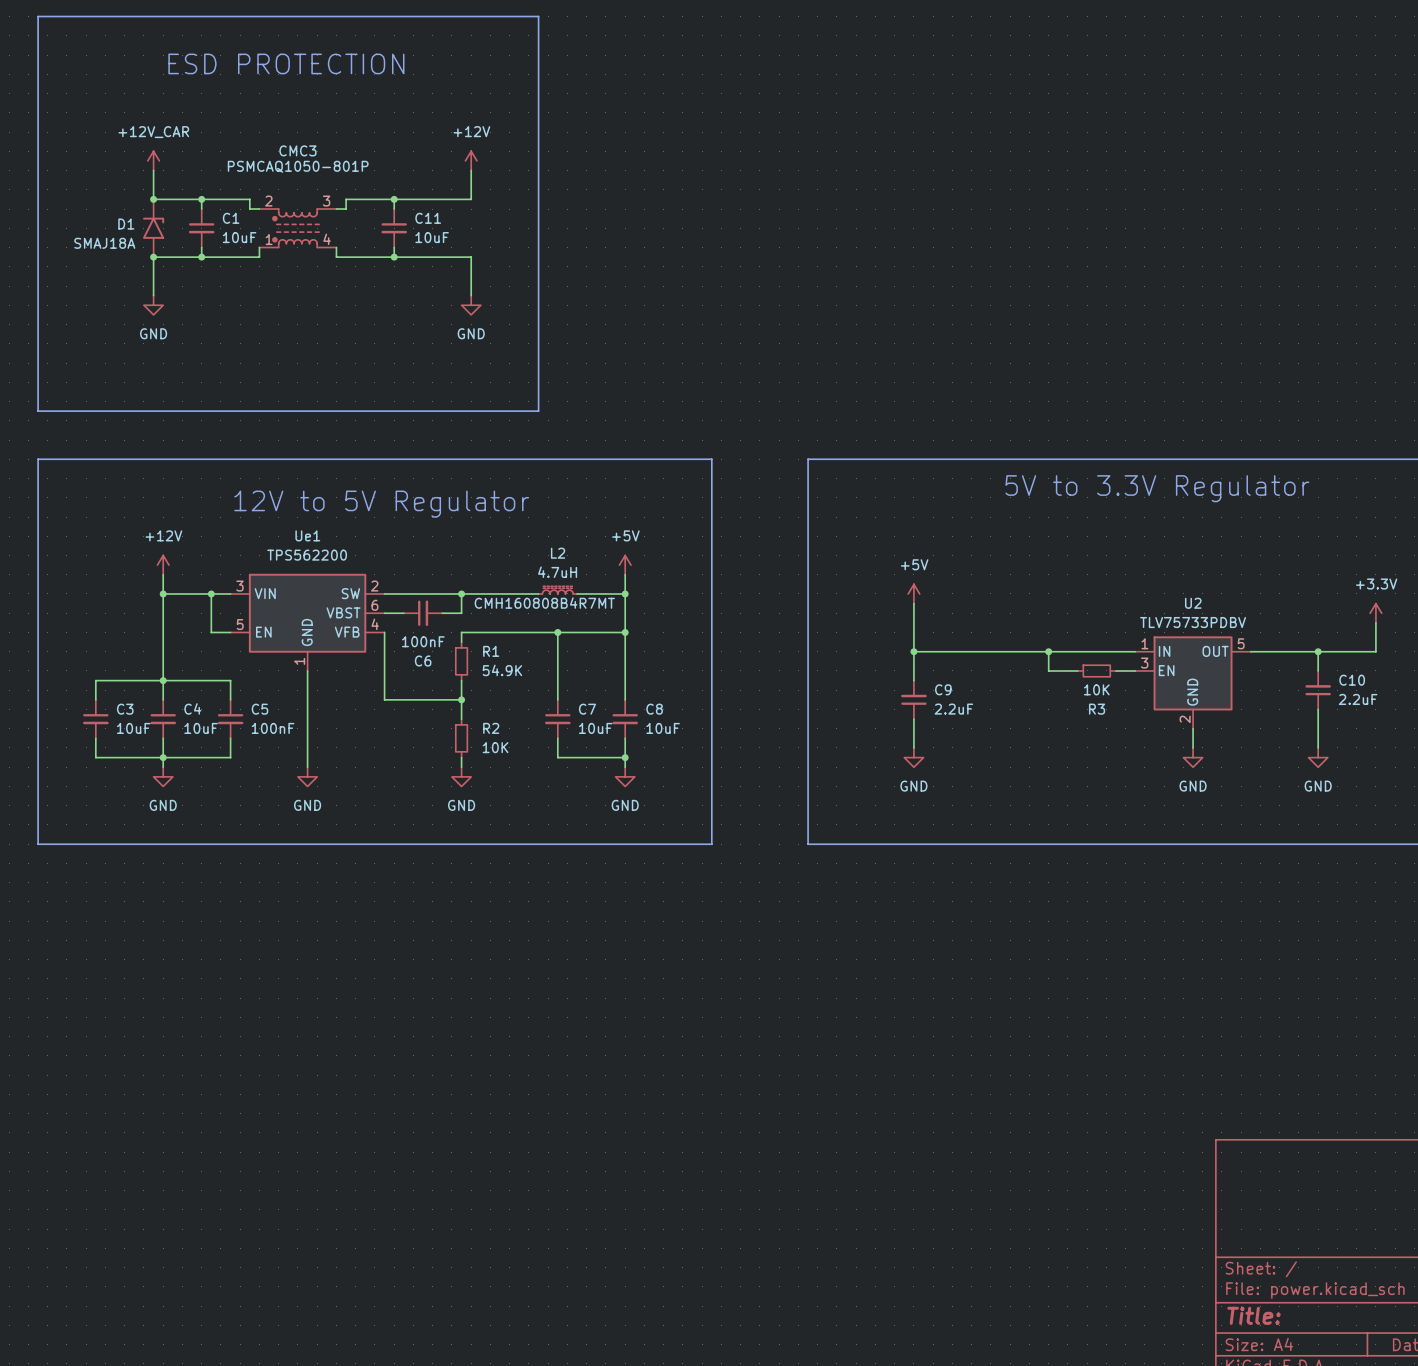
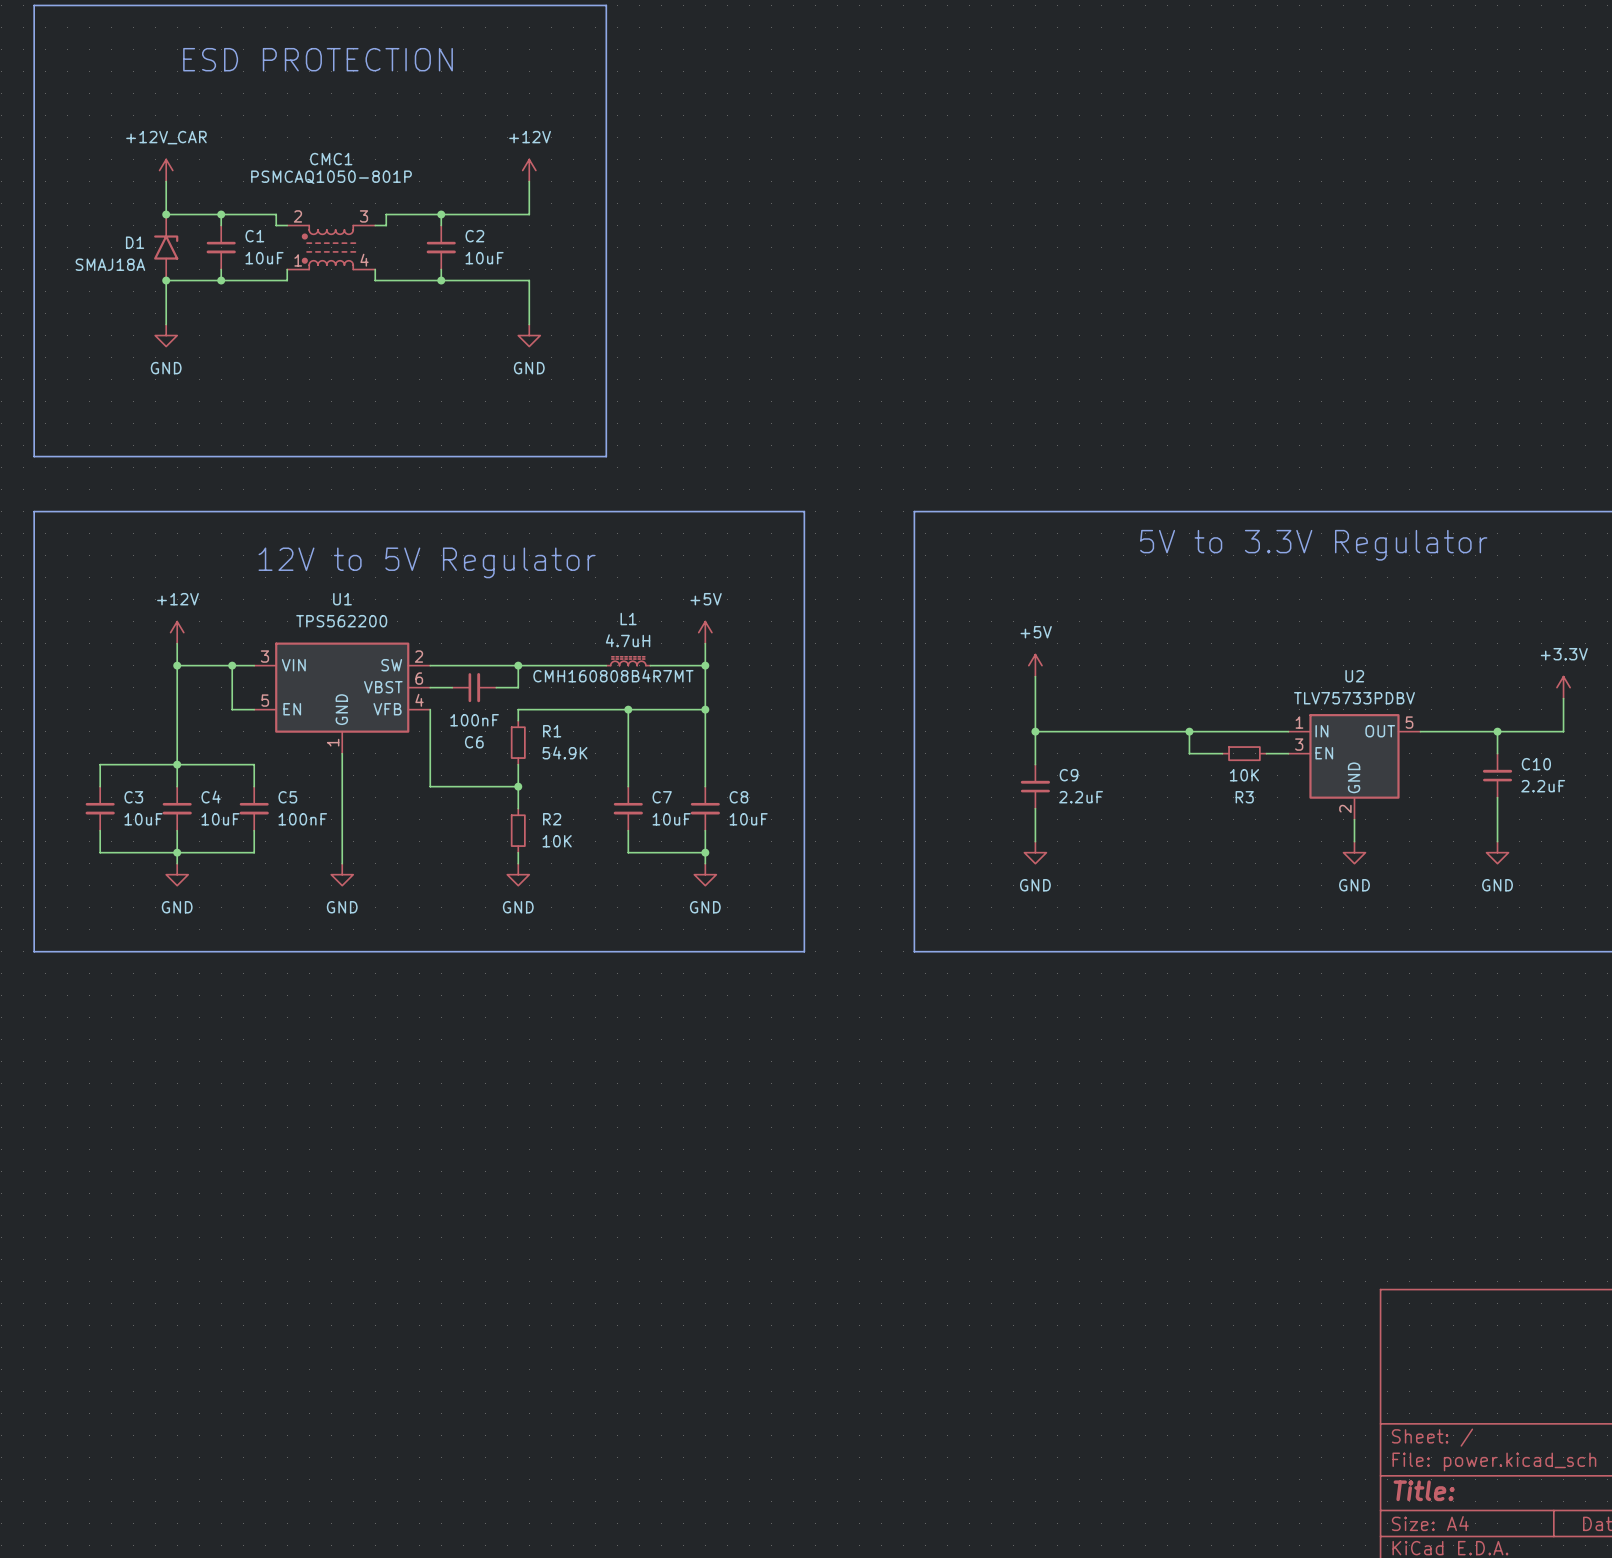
CMC3 name: CMC3 (297, 150) -> CMC1 (331, 159)
C11 name: C11 (428, 218) -> C2 (474, 236)
Ue1 name: Ue1 (307, 535) -> U1 (342, 599)
L2 name: L2 (558, 553) -> L1 (628, 619)

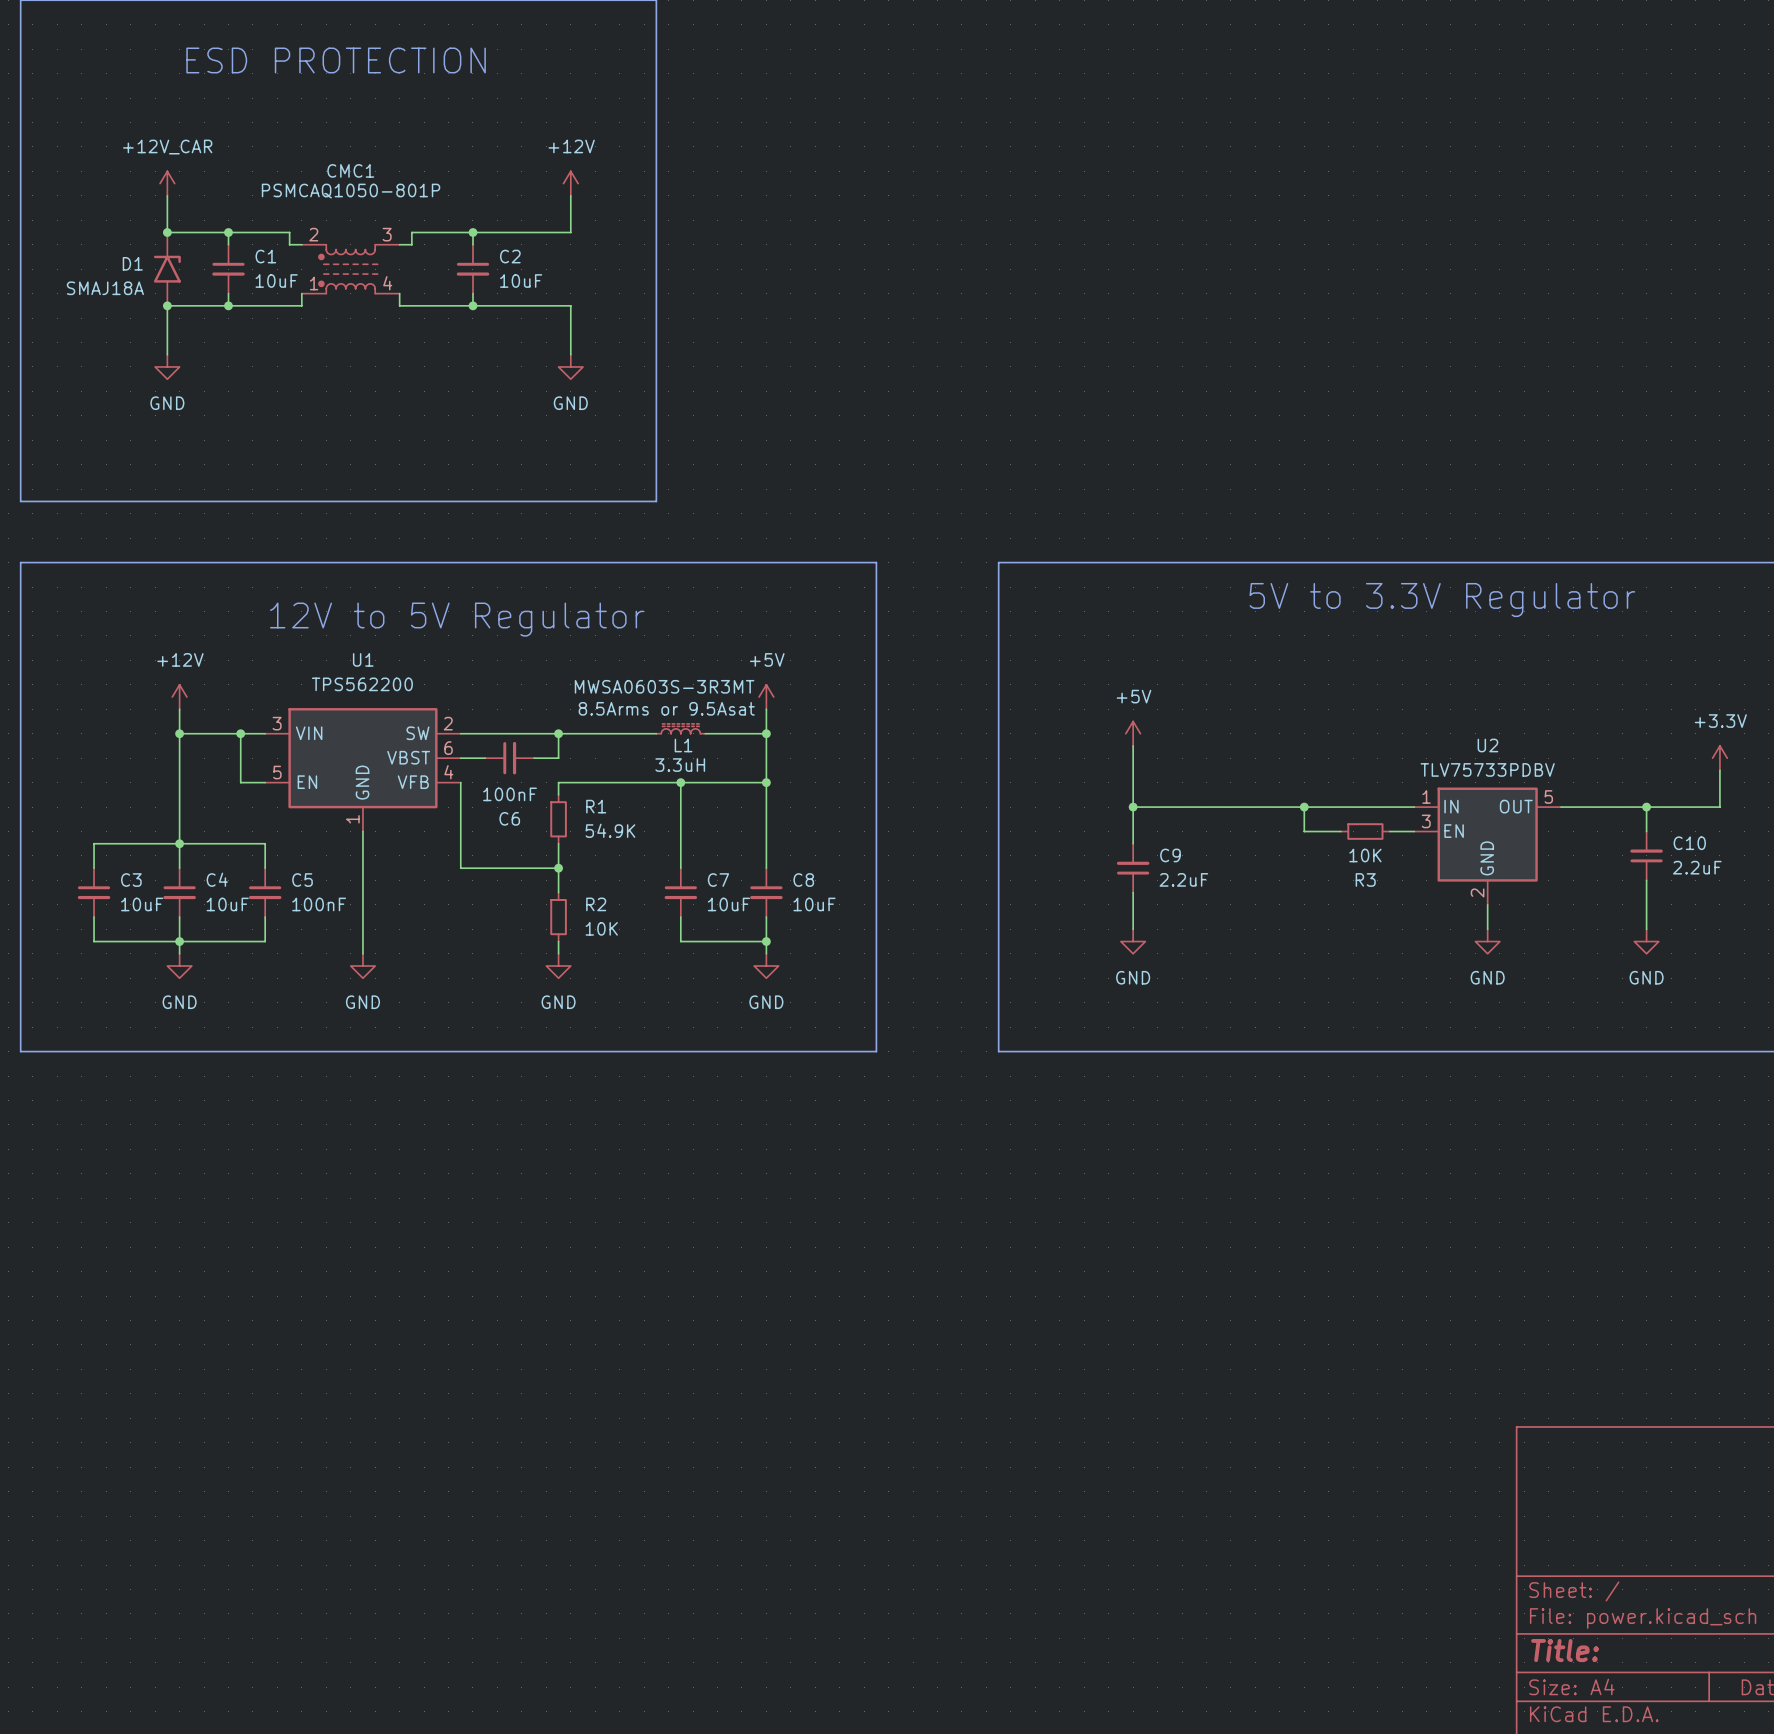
L1 name position: L1 (628, 619) -> L1 (683, 745)
L1 value: 4.7uH (628, 640) -> 3.3uH (680, 765)
L1 text: none -> 8.5Arms or 9.5Asat (666, 708)
L1 text: CMH160808B4R7MT (613, 675) -> MWSA0603S-3R3MT (664, 686)

